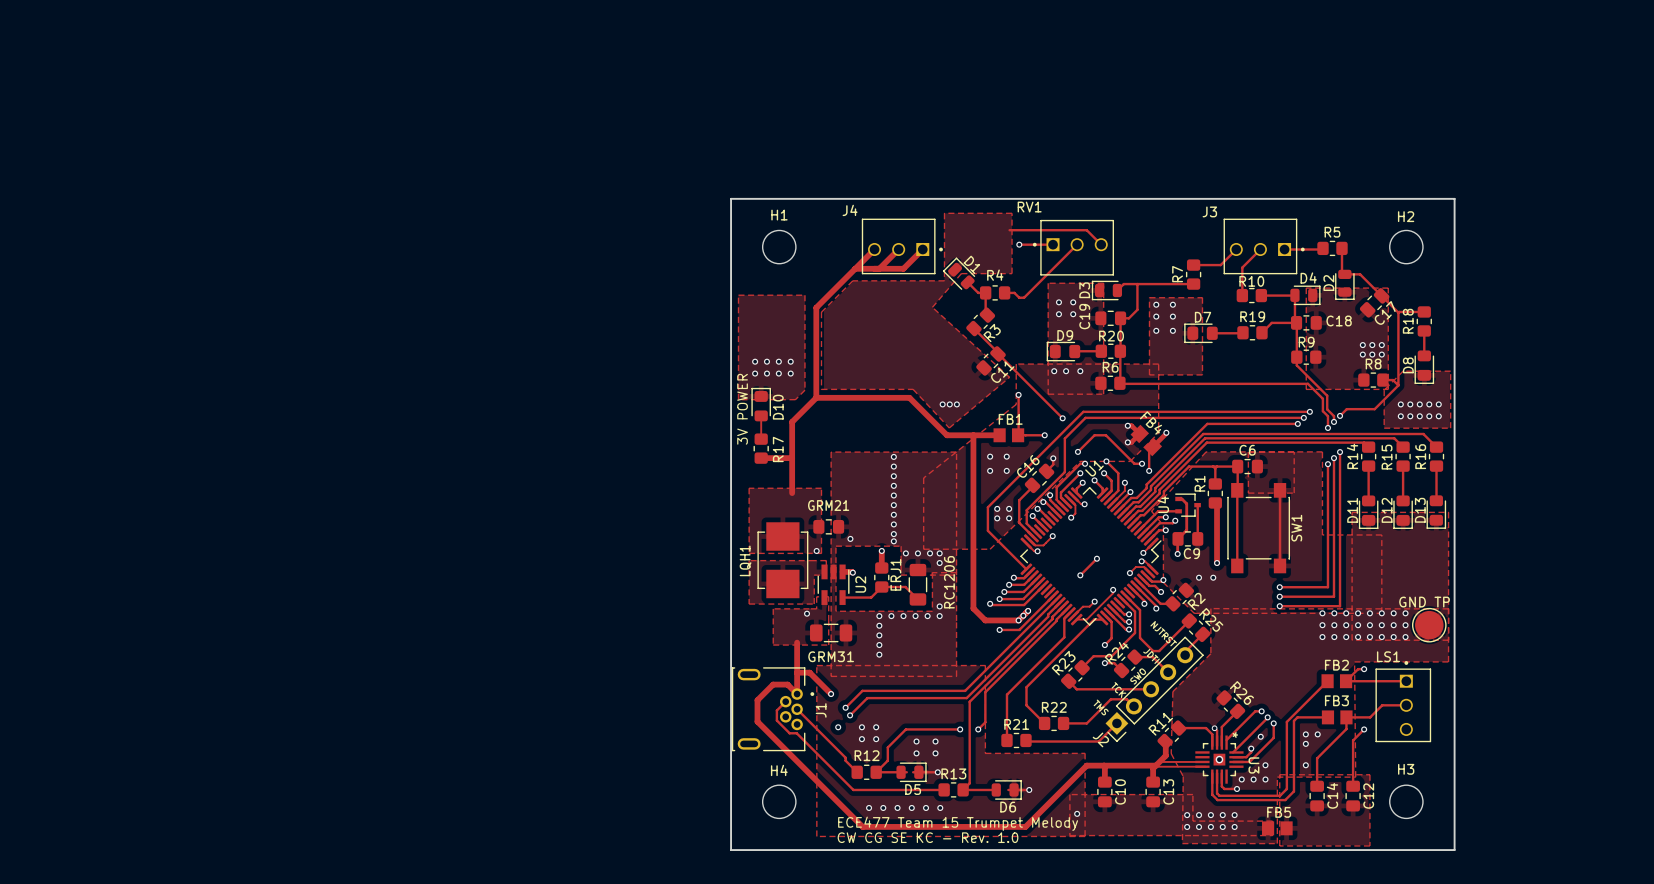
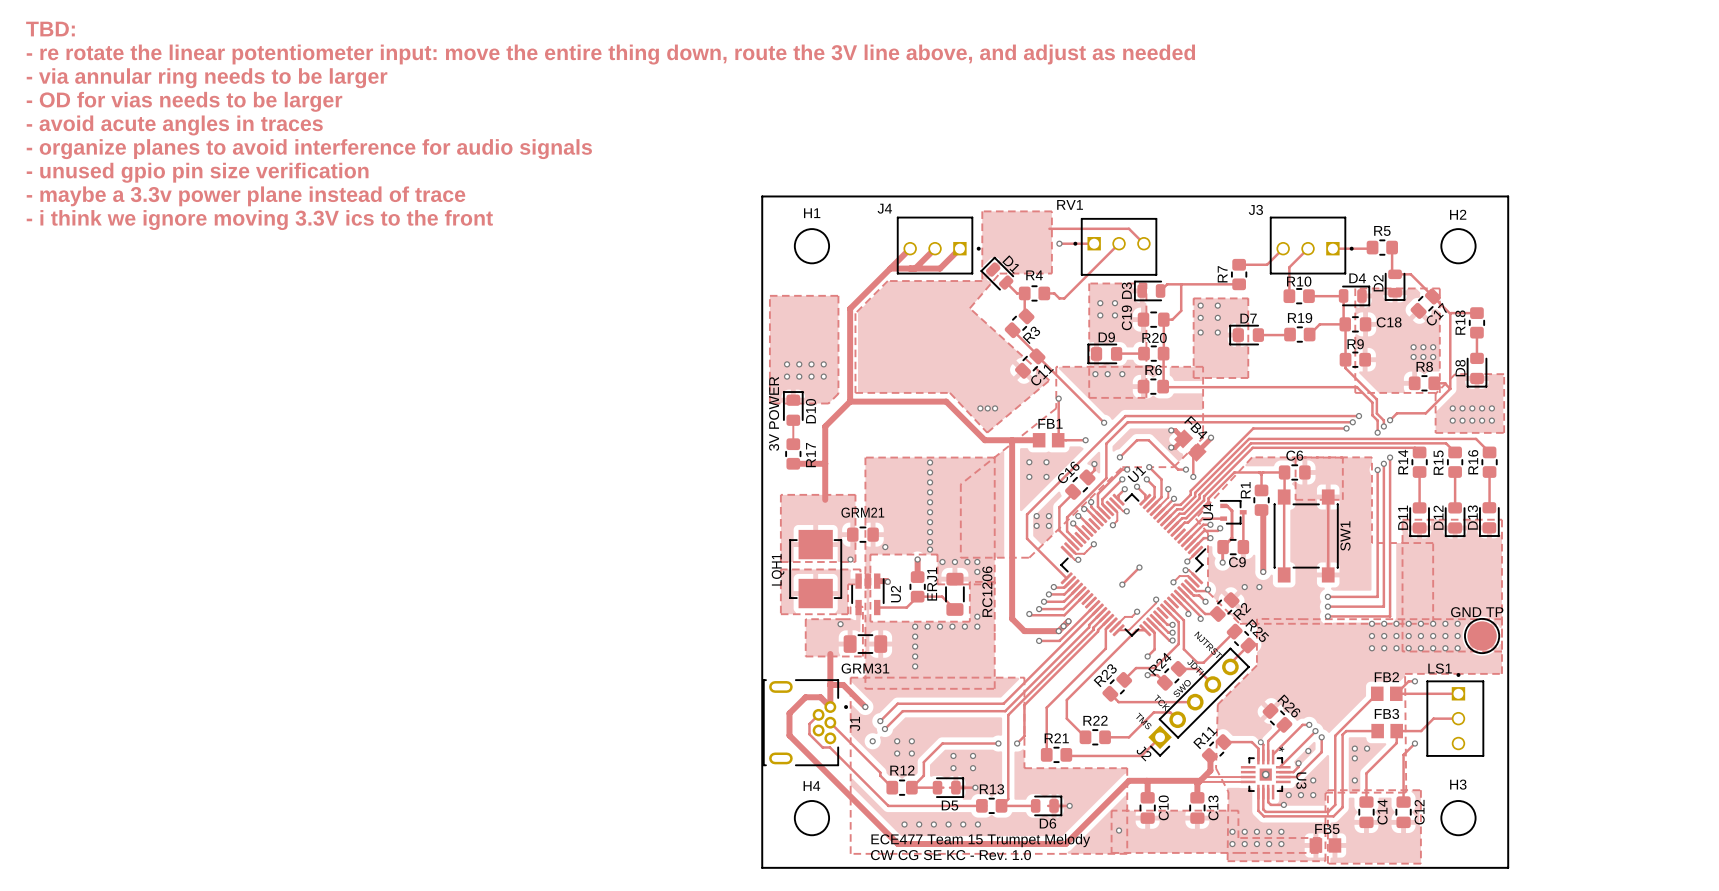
text: none -> TBD: (50, 29)
text: none -> - re rotate the linear potentiometer input: move the entire thing down, route the 3V line above, and adjust as needed (610, 54)
text: none -> - via annular ring needs to be larger (207, 78)
text: none -> - OD for vias needs to be larger (184, 101)
text: none -> - avoid acute angles in traces (174, 125)
text: none -> - organize planes to avoid interference for audio signals (309, 149)
text: none -> - unused gpio pin size verification (197, 172)
text: none -> - maybe a 3.3v power plane instead of trace (246, 196)
text: none -> - i think we ignore moving 3.3V ics to the front (259, 220)

